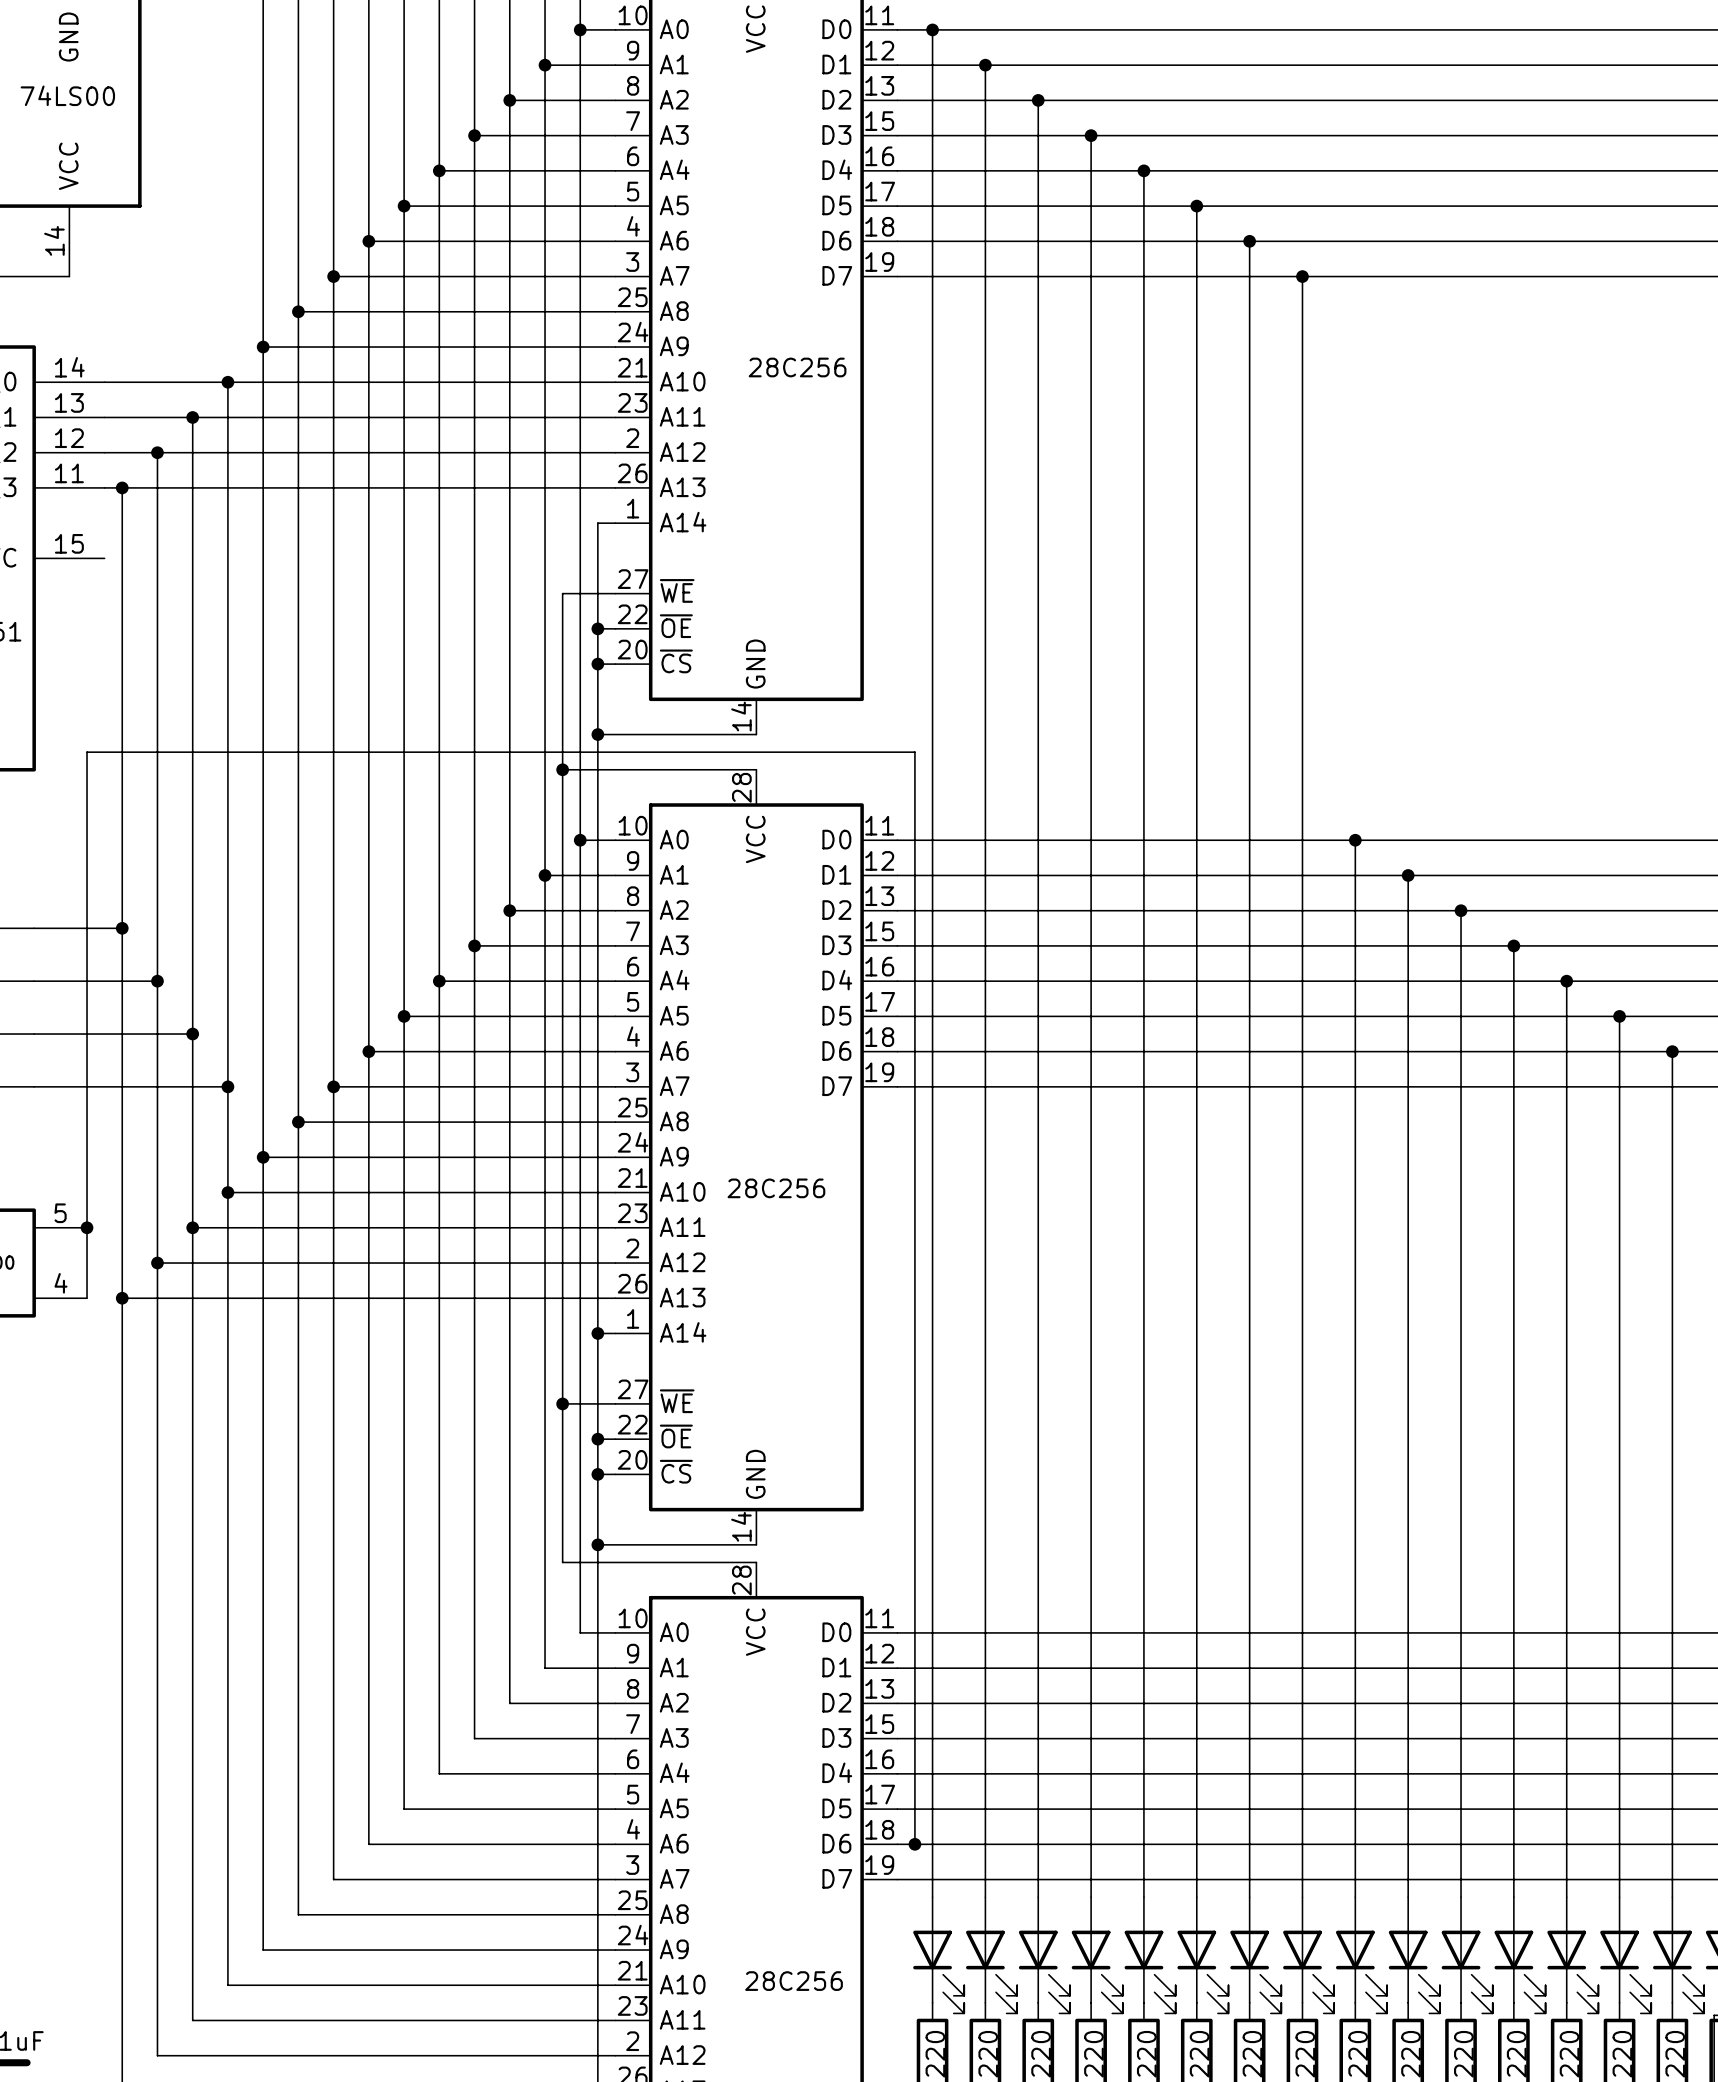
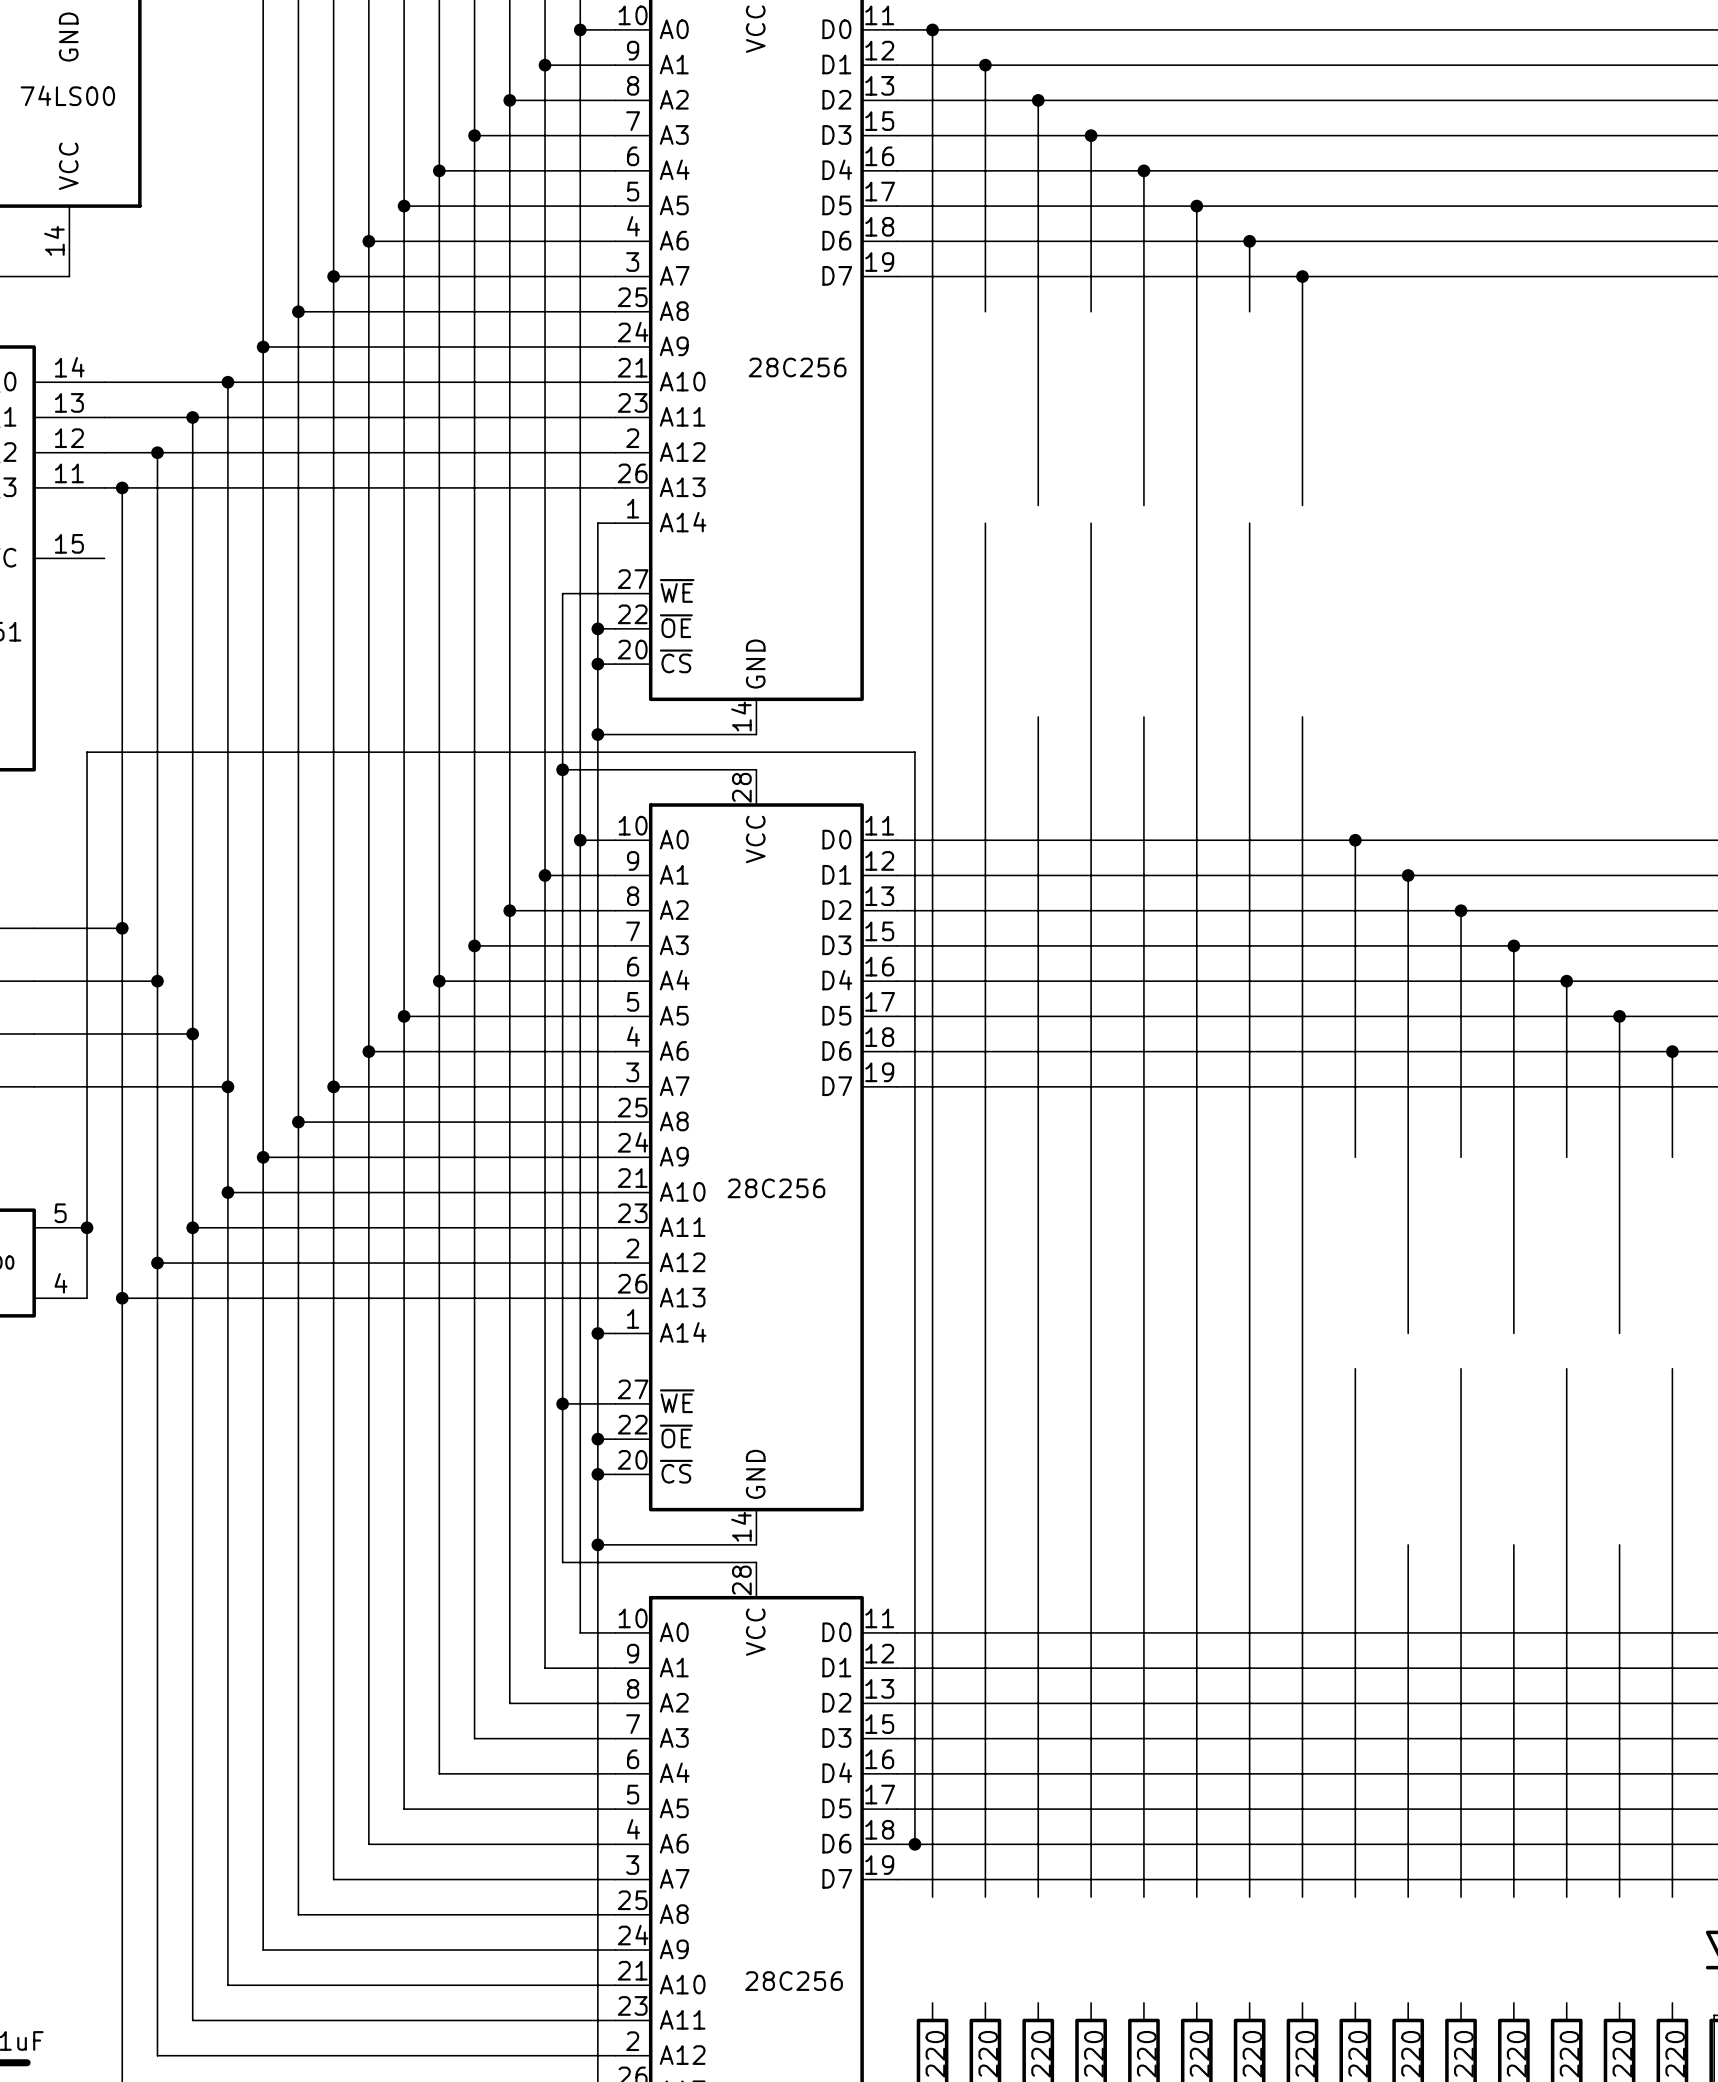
wire: (985, 311) (985, 523) -> none
wire: (1091, 311) (1091, 523) -> none
wire: (1249, 311) (1249, 523) -> none
wire: (1038, 505) (1038, 716) -> none
wire: (1143, 505) (1143, 716) -> none
wire: (1302, 505) (1302, 716) -> none
wire: (1355, 1157) (1355, 1368) -> none
wire: (1461, 1157) (1461, 1368) -> none
wire: (1566, 1157) (1566, 1368) -> none
wire: (1672, 1157) (1672, 1368) -> none
wire: (1408, 1333) (1408, 1544) -> none
wire: (1513, 1333) (1513, 1544) -> none
wire: (1619, 1333) (1619, 1544) -> none
part: (938, 1955) -> none
part: (991, 1955) -> none
part: (1044, 1955) -> none
part: (1097, 1955) -> none
part: (1150, 1955) -> none
part: (1202, 1955) -> none
part: (1255, 1955) -> none
part: (1308, 1955) -> none
part: (1361, 1955) -> none
part: (1414, 1955) -> none
part: (1467, 1955) -> none
part: (1520, 1955) -> none
part: (1572, 1955) -> none
part: (1625, 1955) -> none
part: (1678, 1955) -> none

